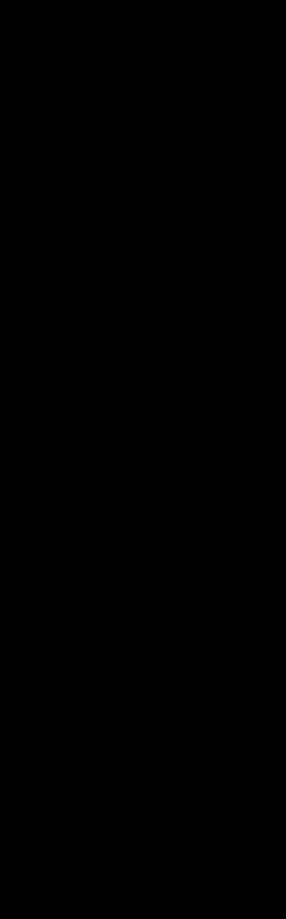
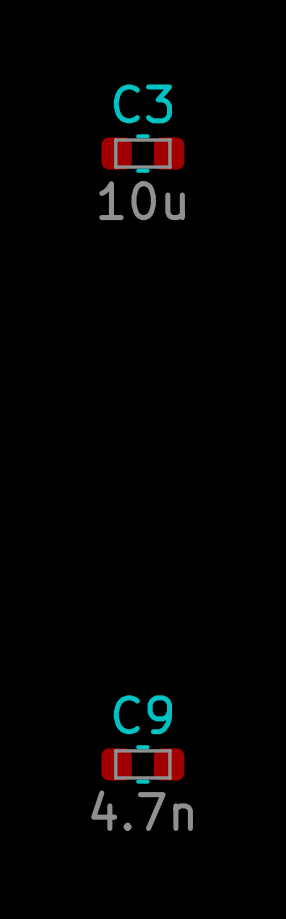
C3: none -> 10u (142, 153)
C9: none -> 4.7n (142, 764)

